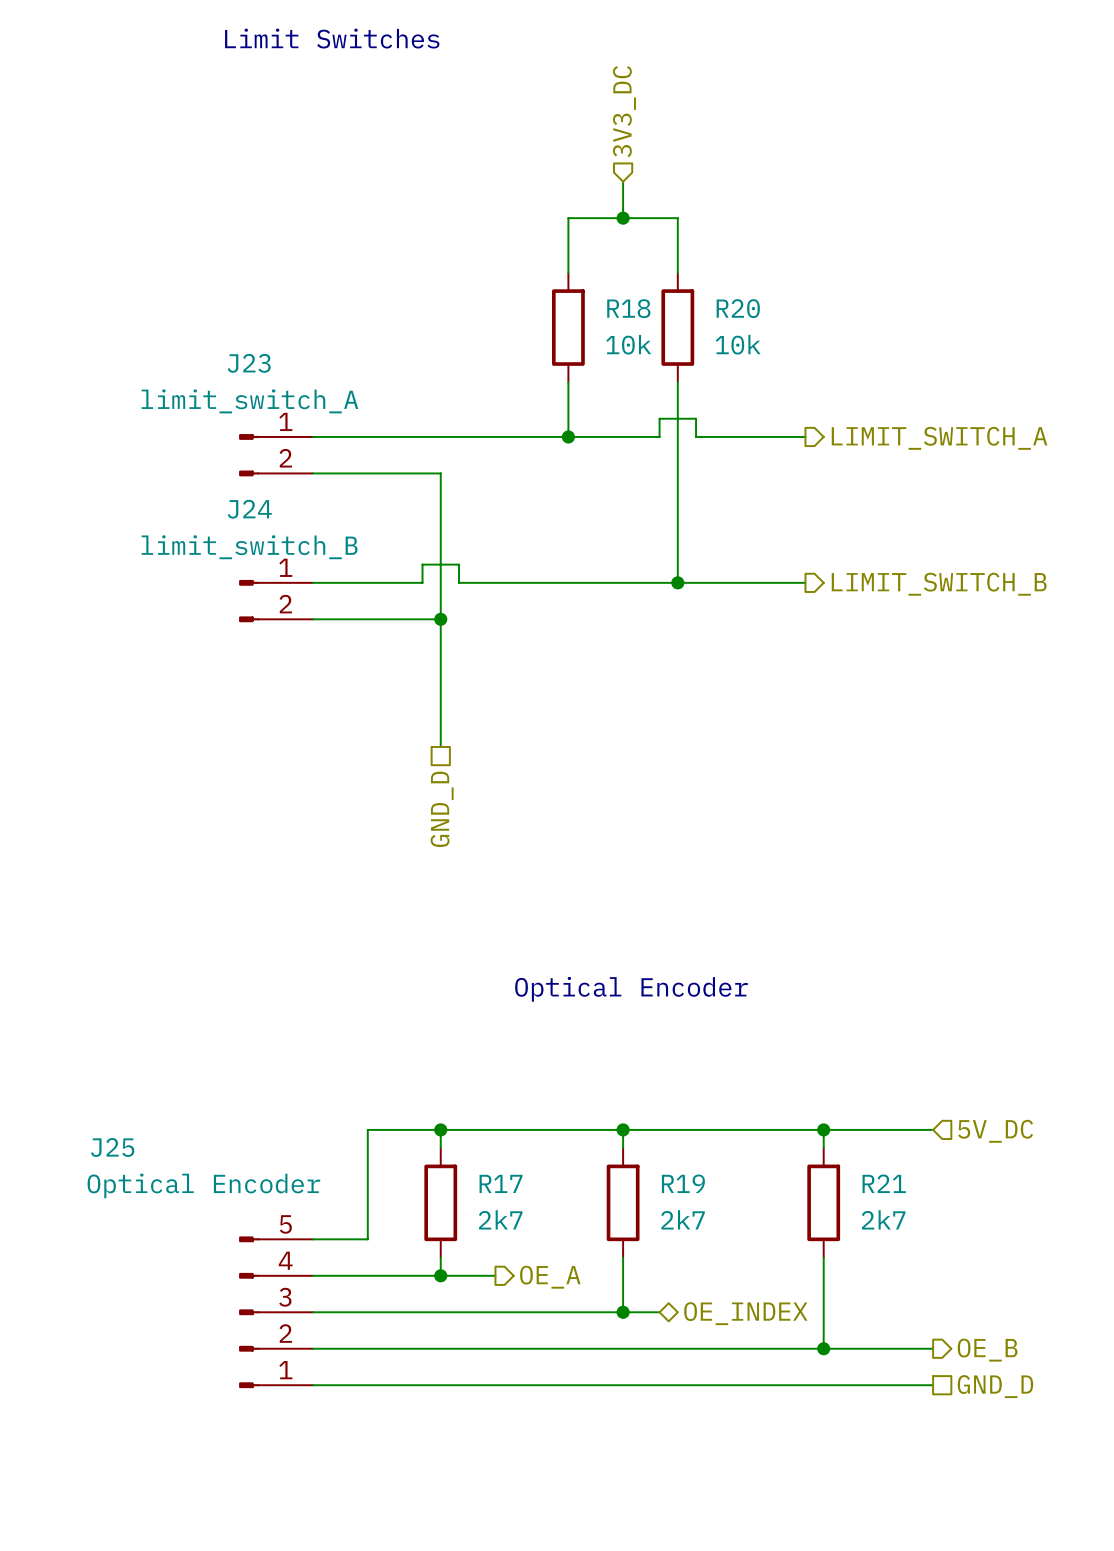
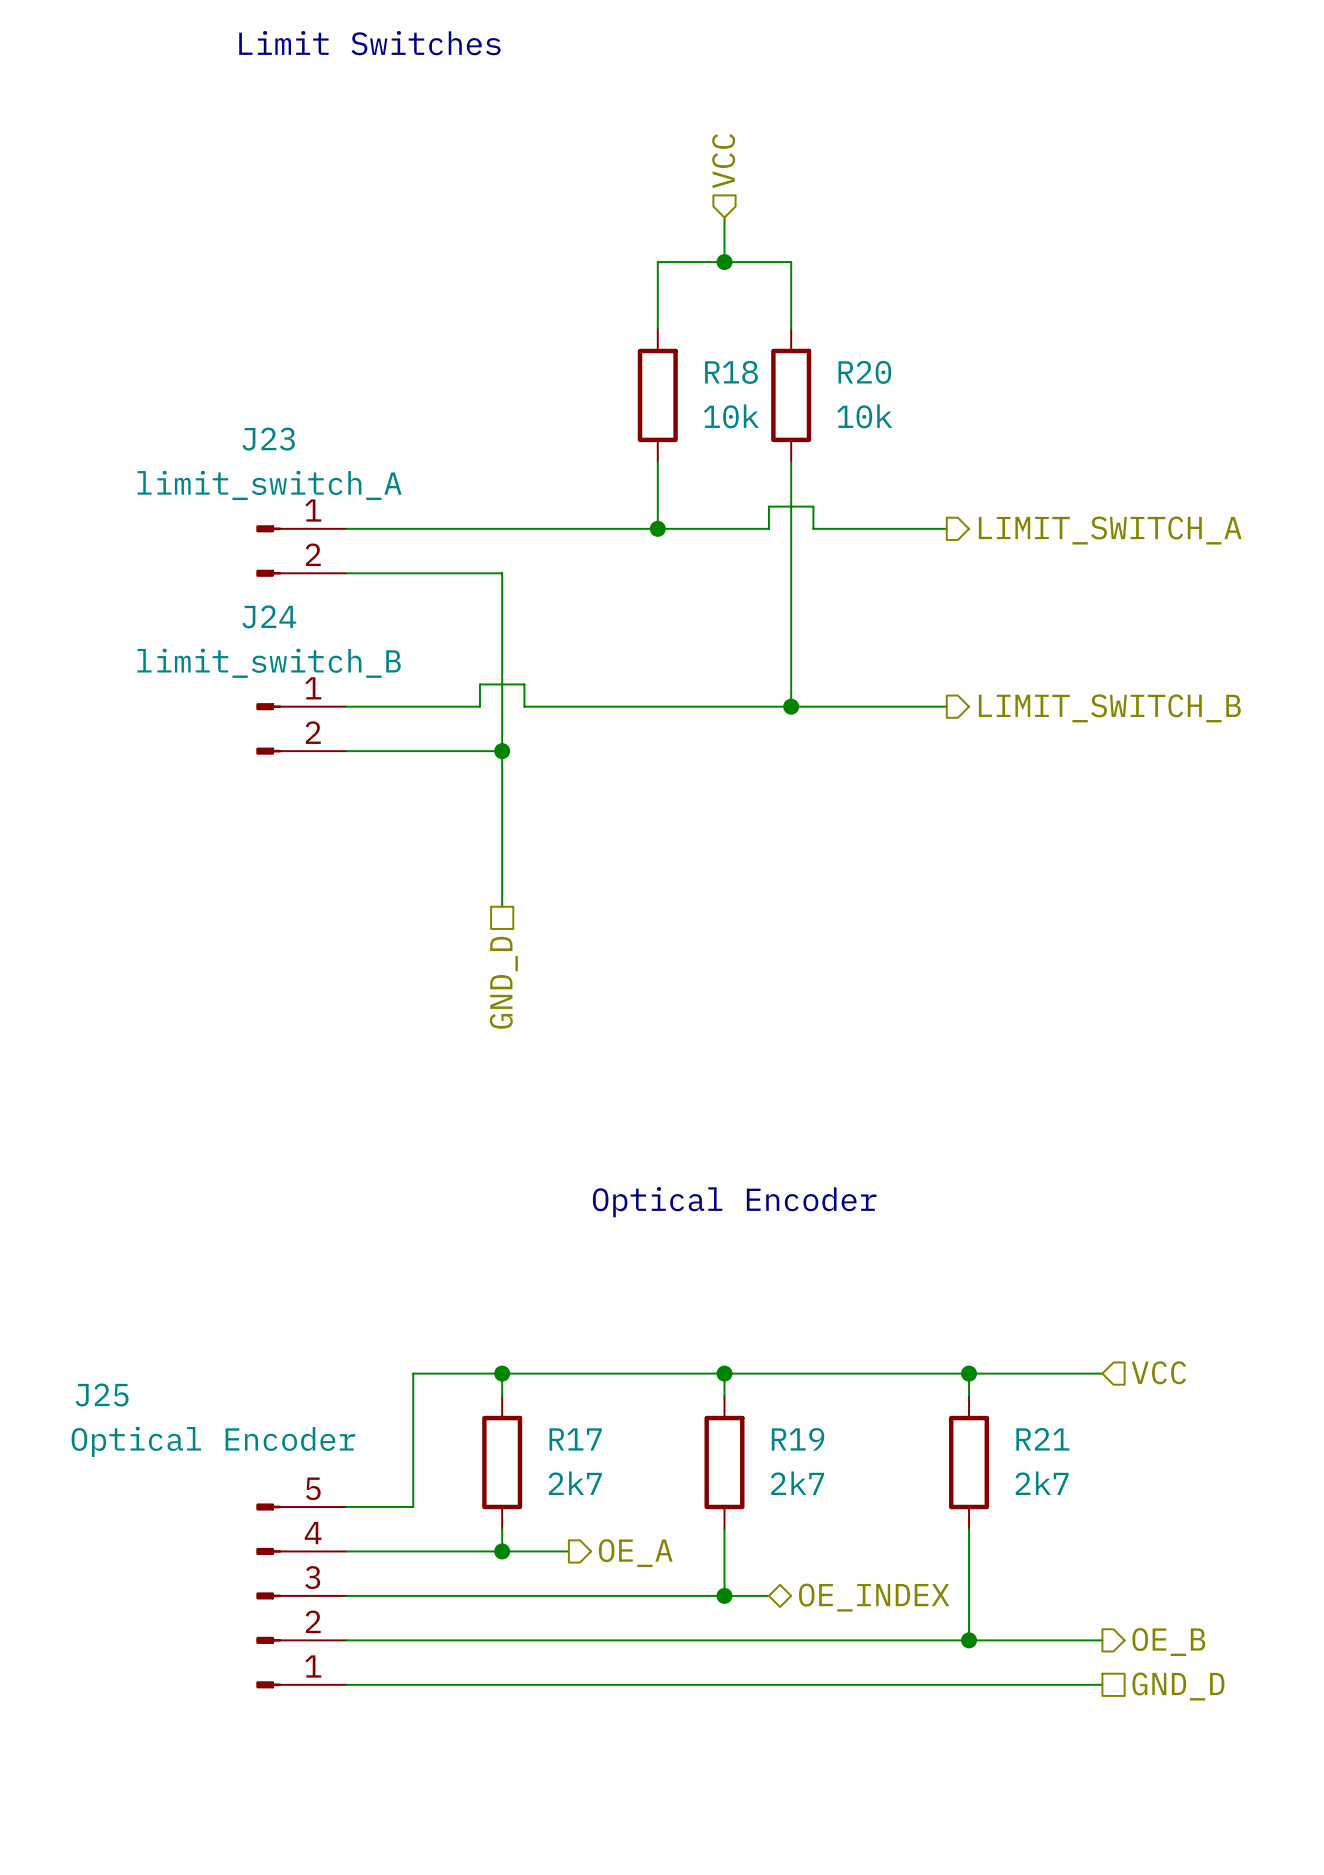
hierarchical label: 3V3_DC (624, 111) -> VCC (723, 161)
hierarchical label: 5V_DC (995, 1131) -> VCC (1158, 1372)

